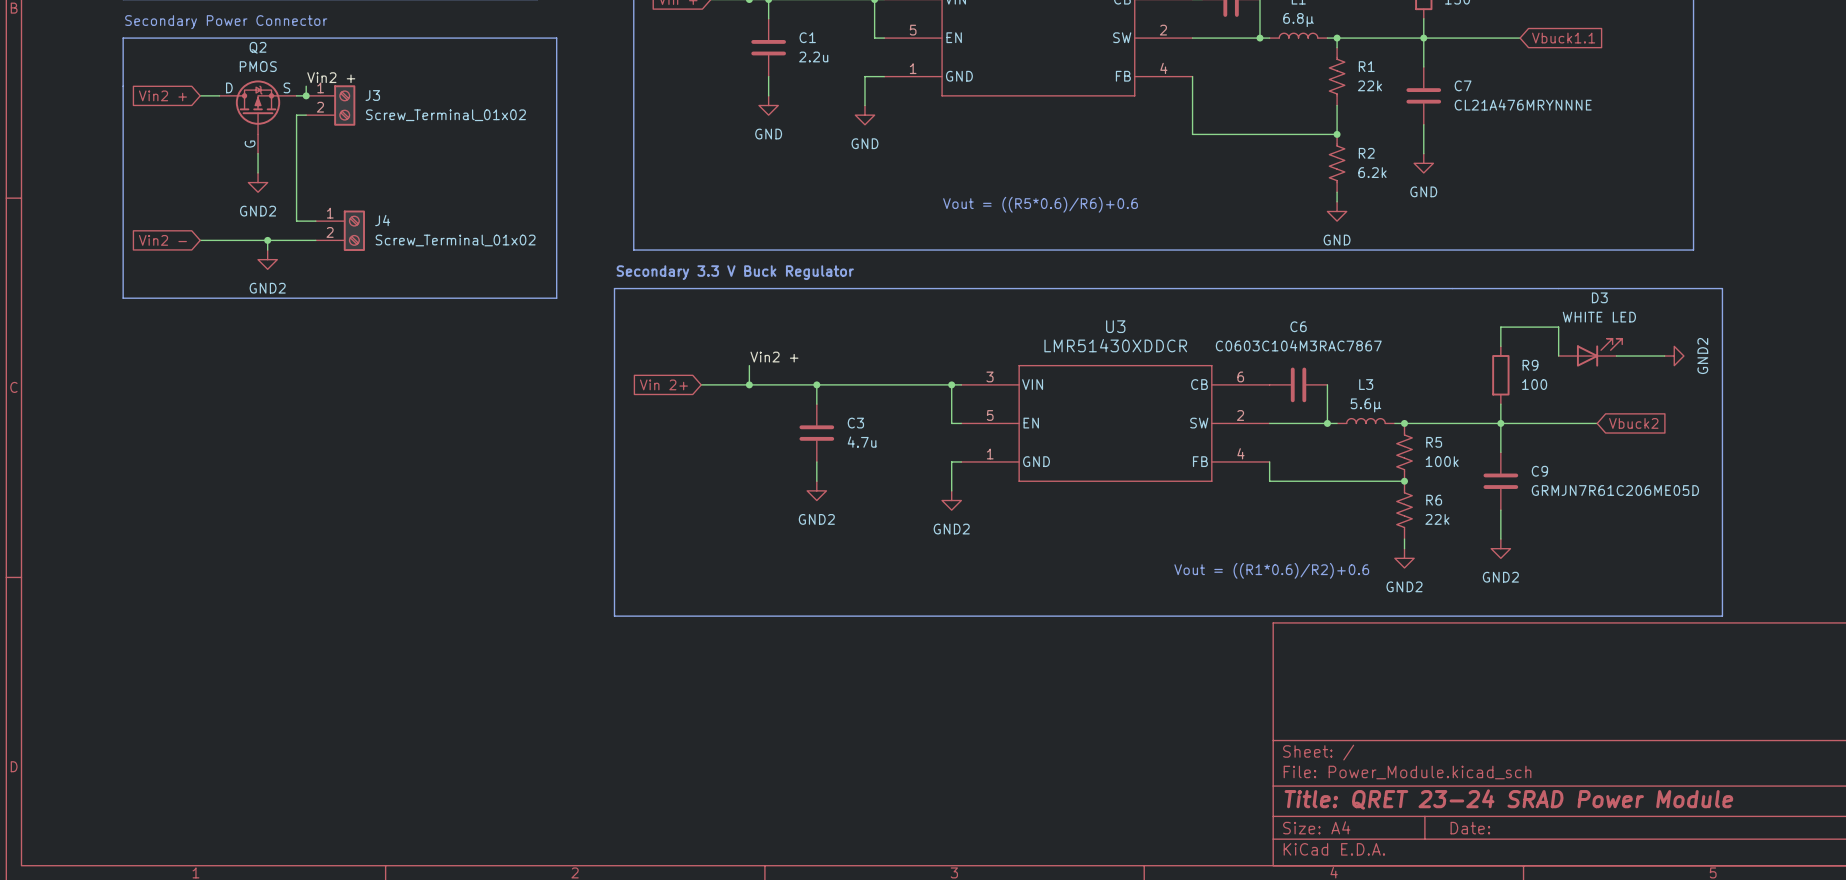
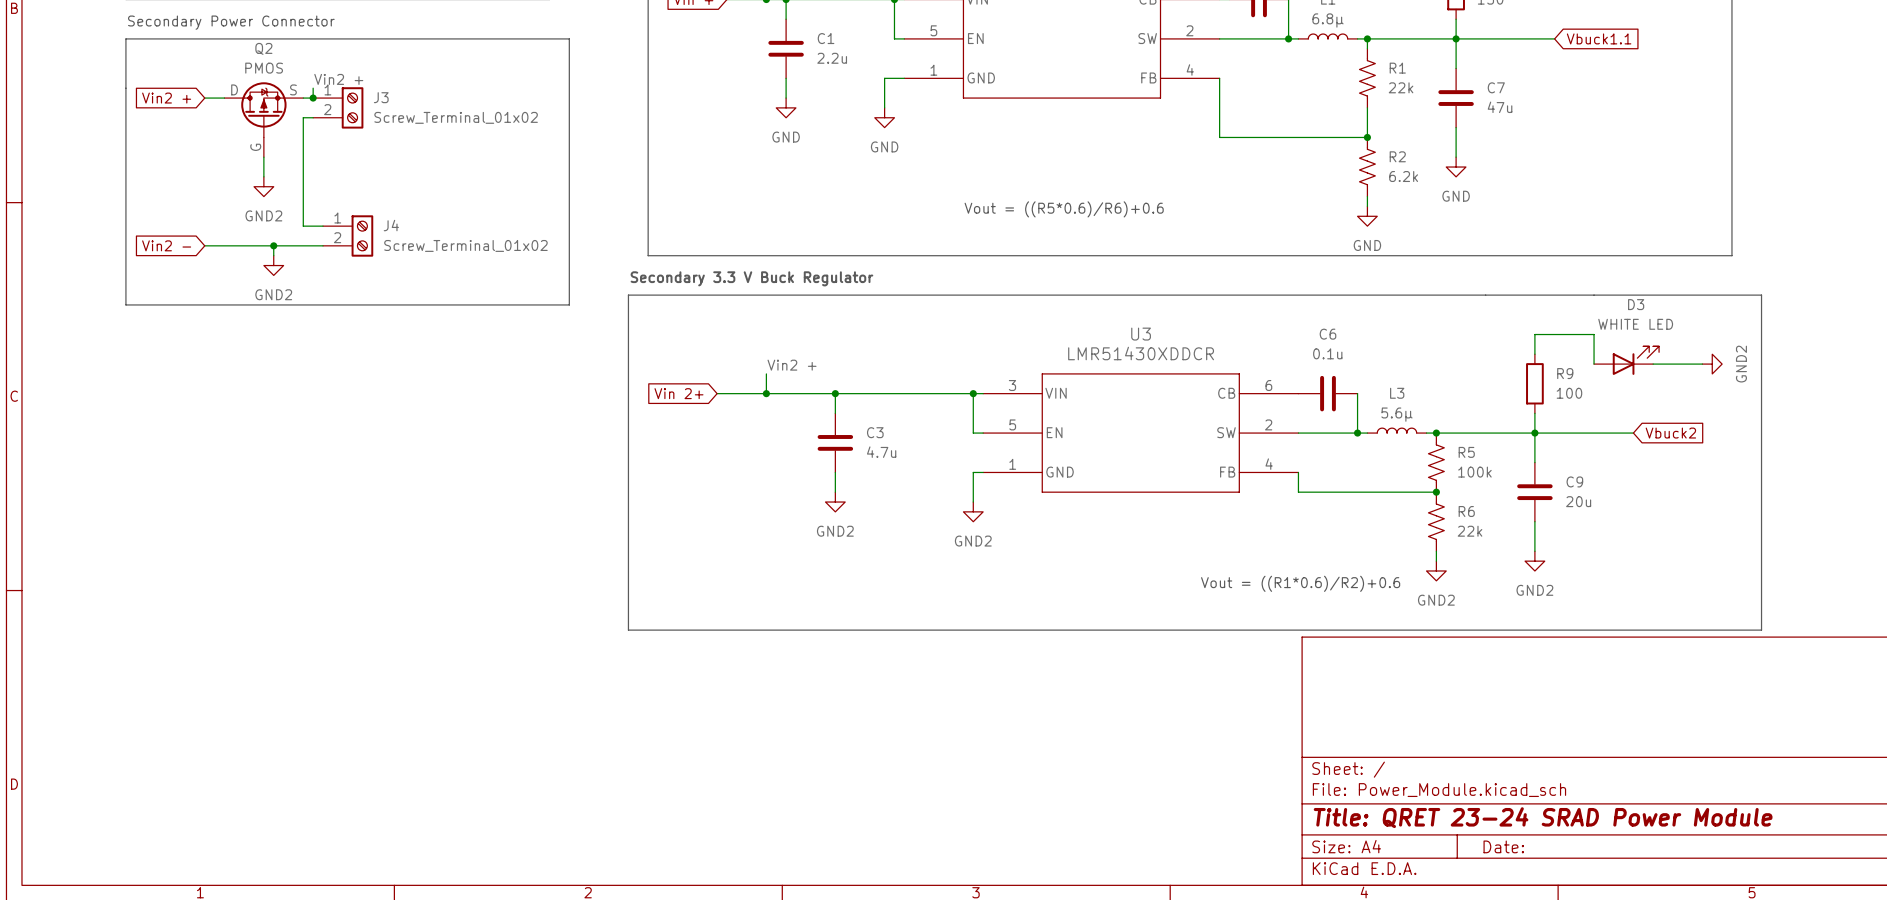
C7 value: CL21A476MRYNNNE (1523, 104) -> 47u (1500, 107)
C6 value: C0603C104M3RAC7867 (1298, 345) -> 0.1u (1327, 353)
C9 value: GRMJN7R61C206ME05D (1615, 490) -> 20u (1578, 501)

